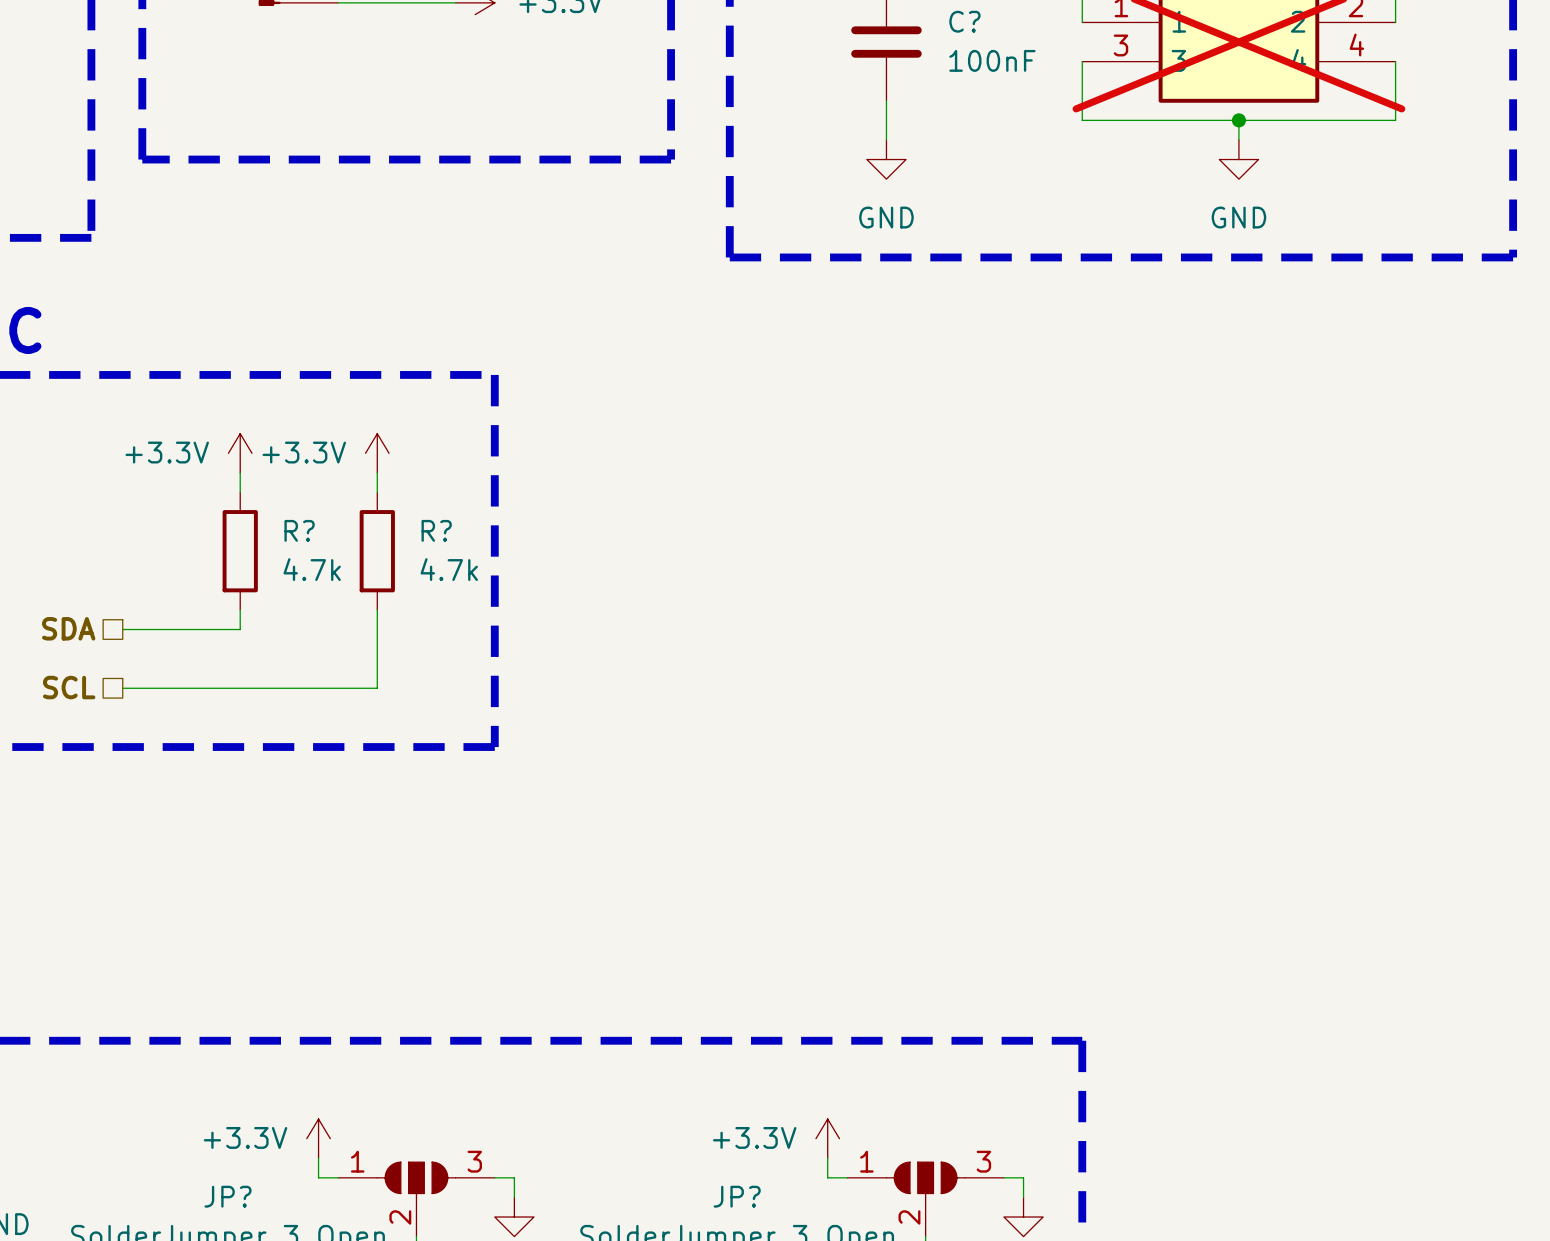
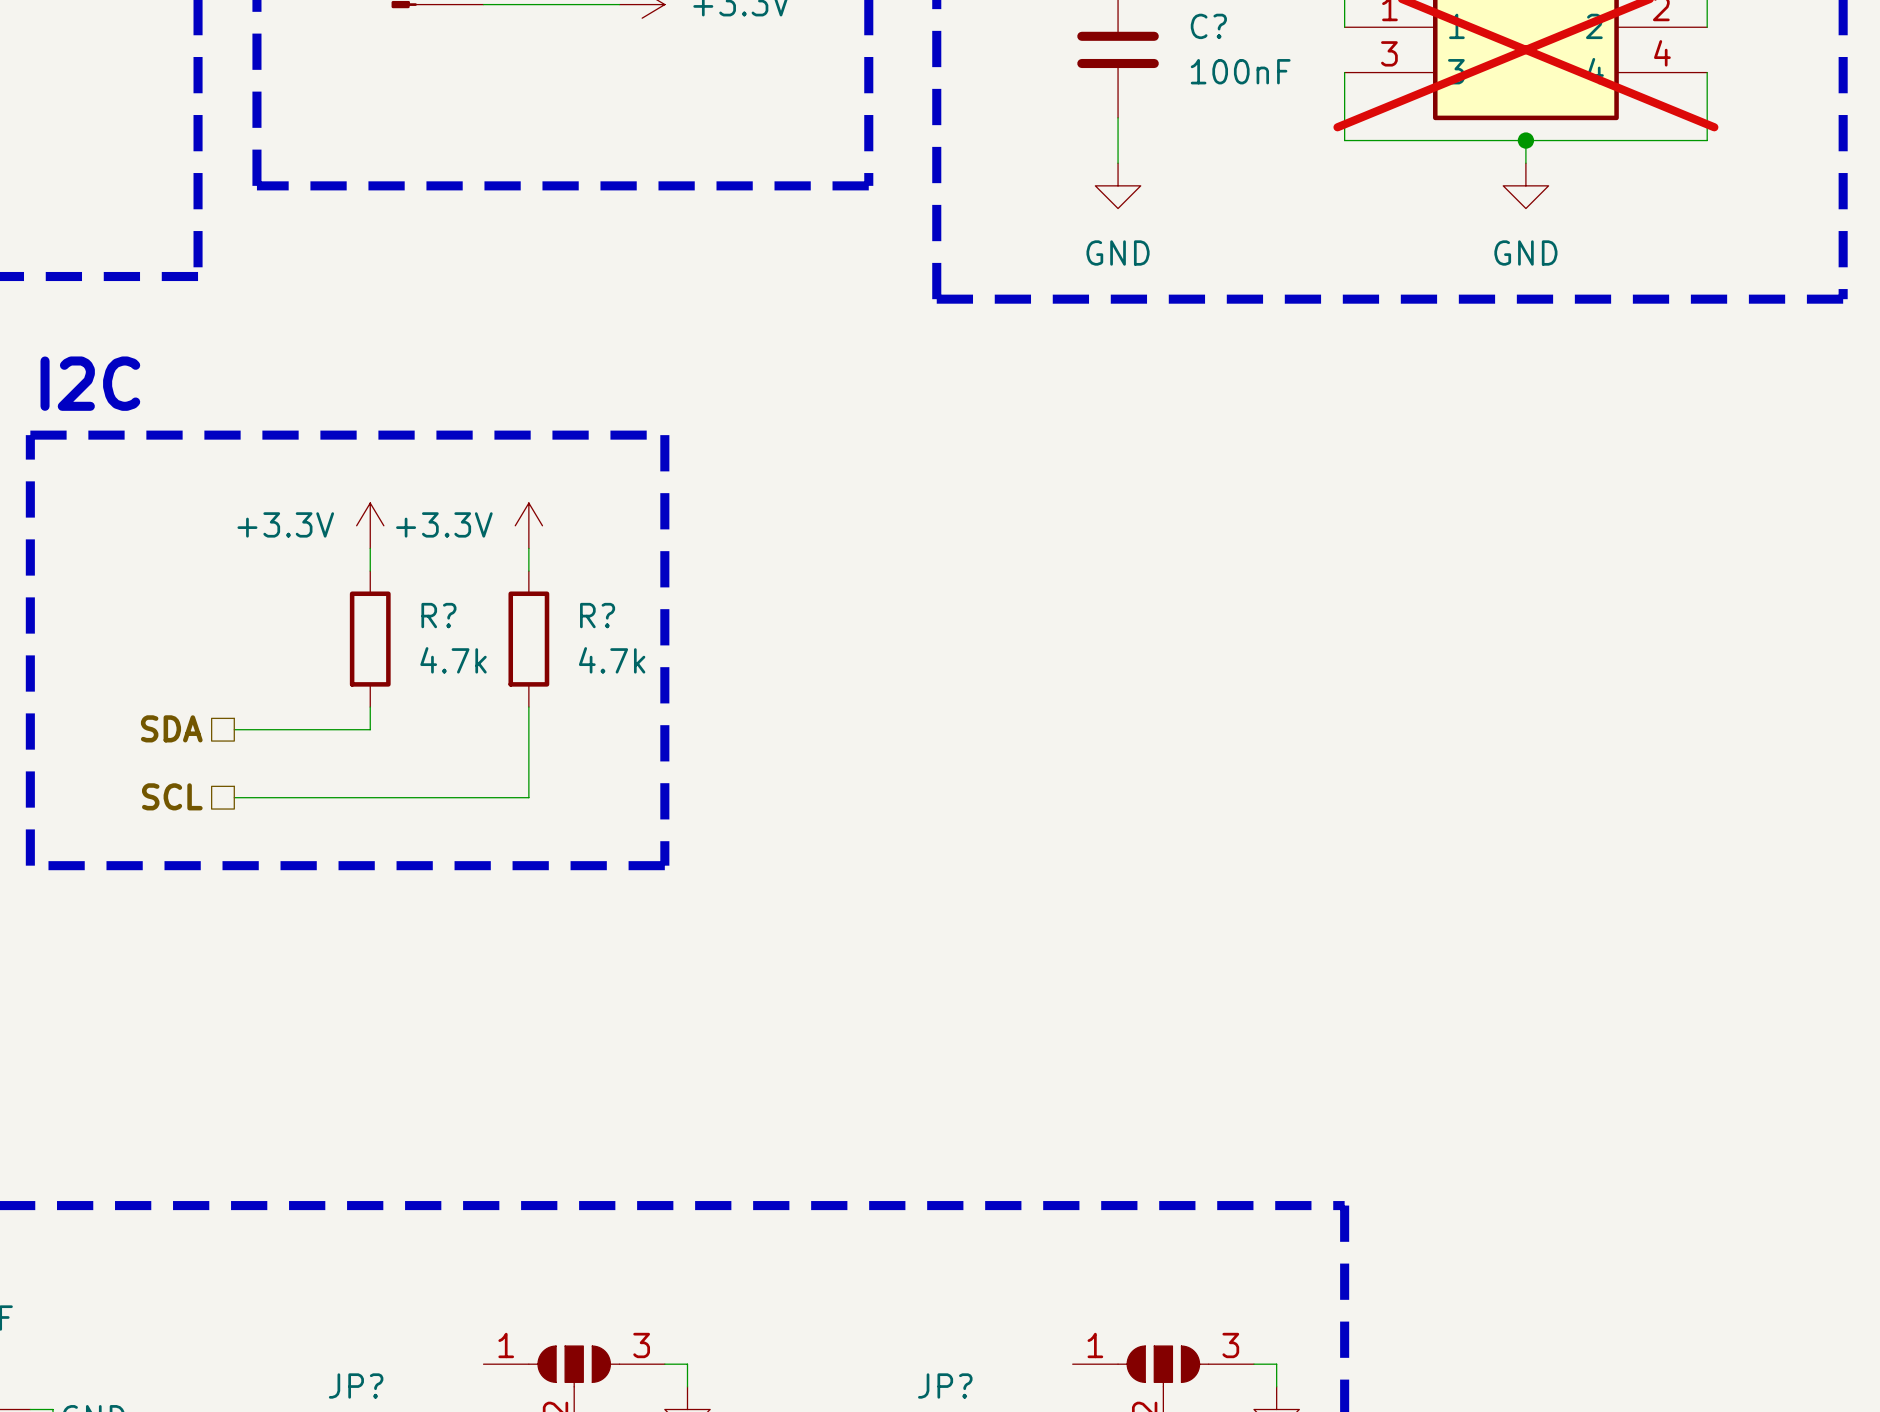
power symbol: +3.3V (318, 1138) -> none
power symbol: +3.3V (827, 1138) -> none
wire: (318, 1158) (318, 1177) (338, 1177) -> none
wire: (827, 1158) (827, 1177) (847, 1177) -> none

